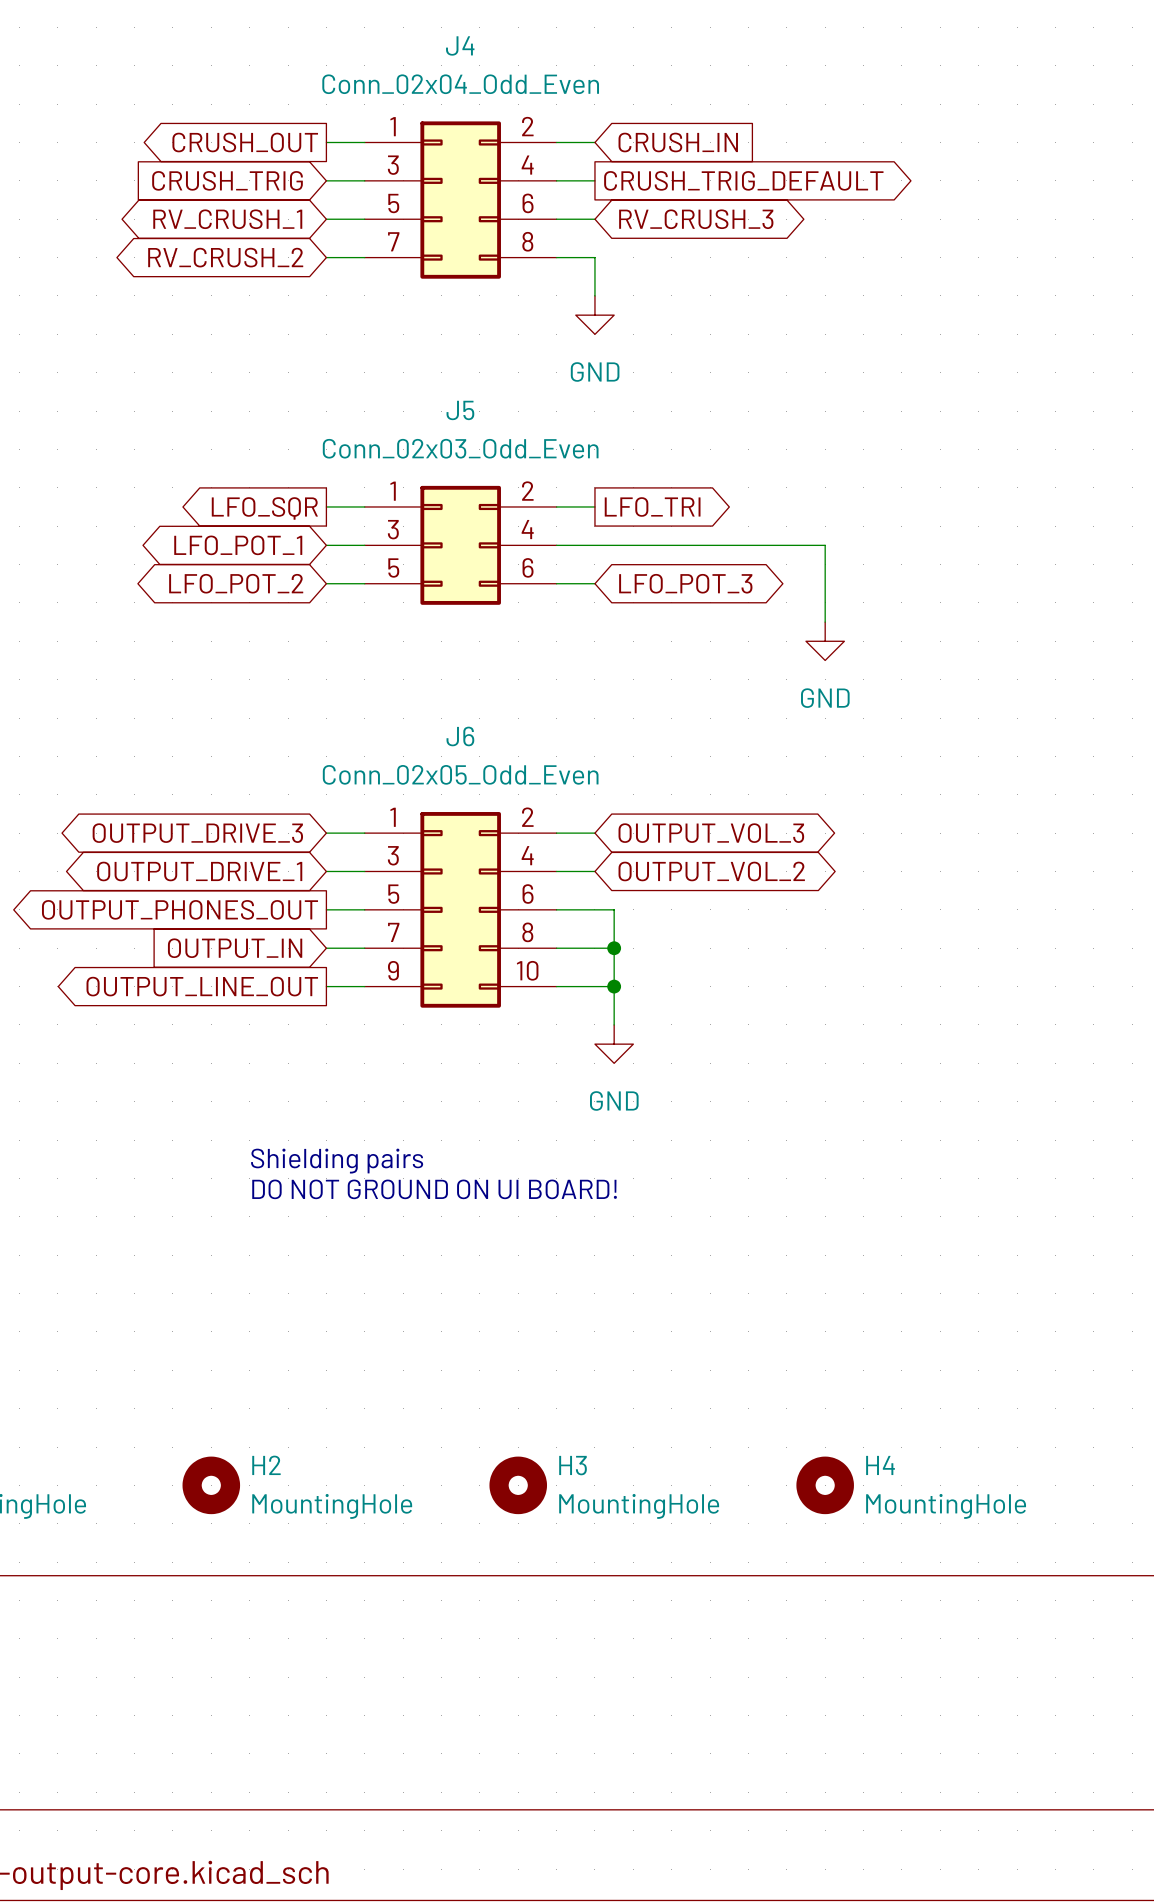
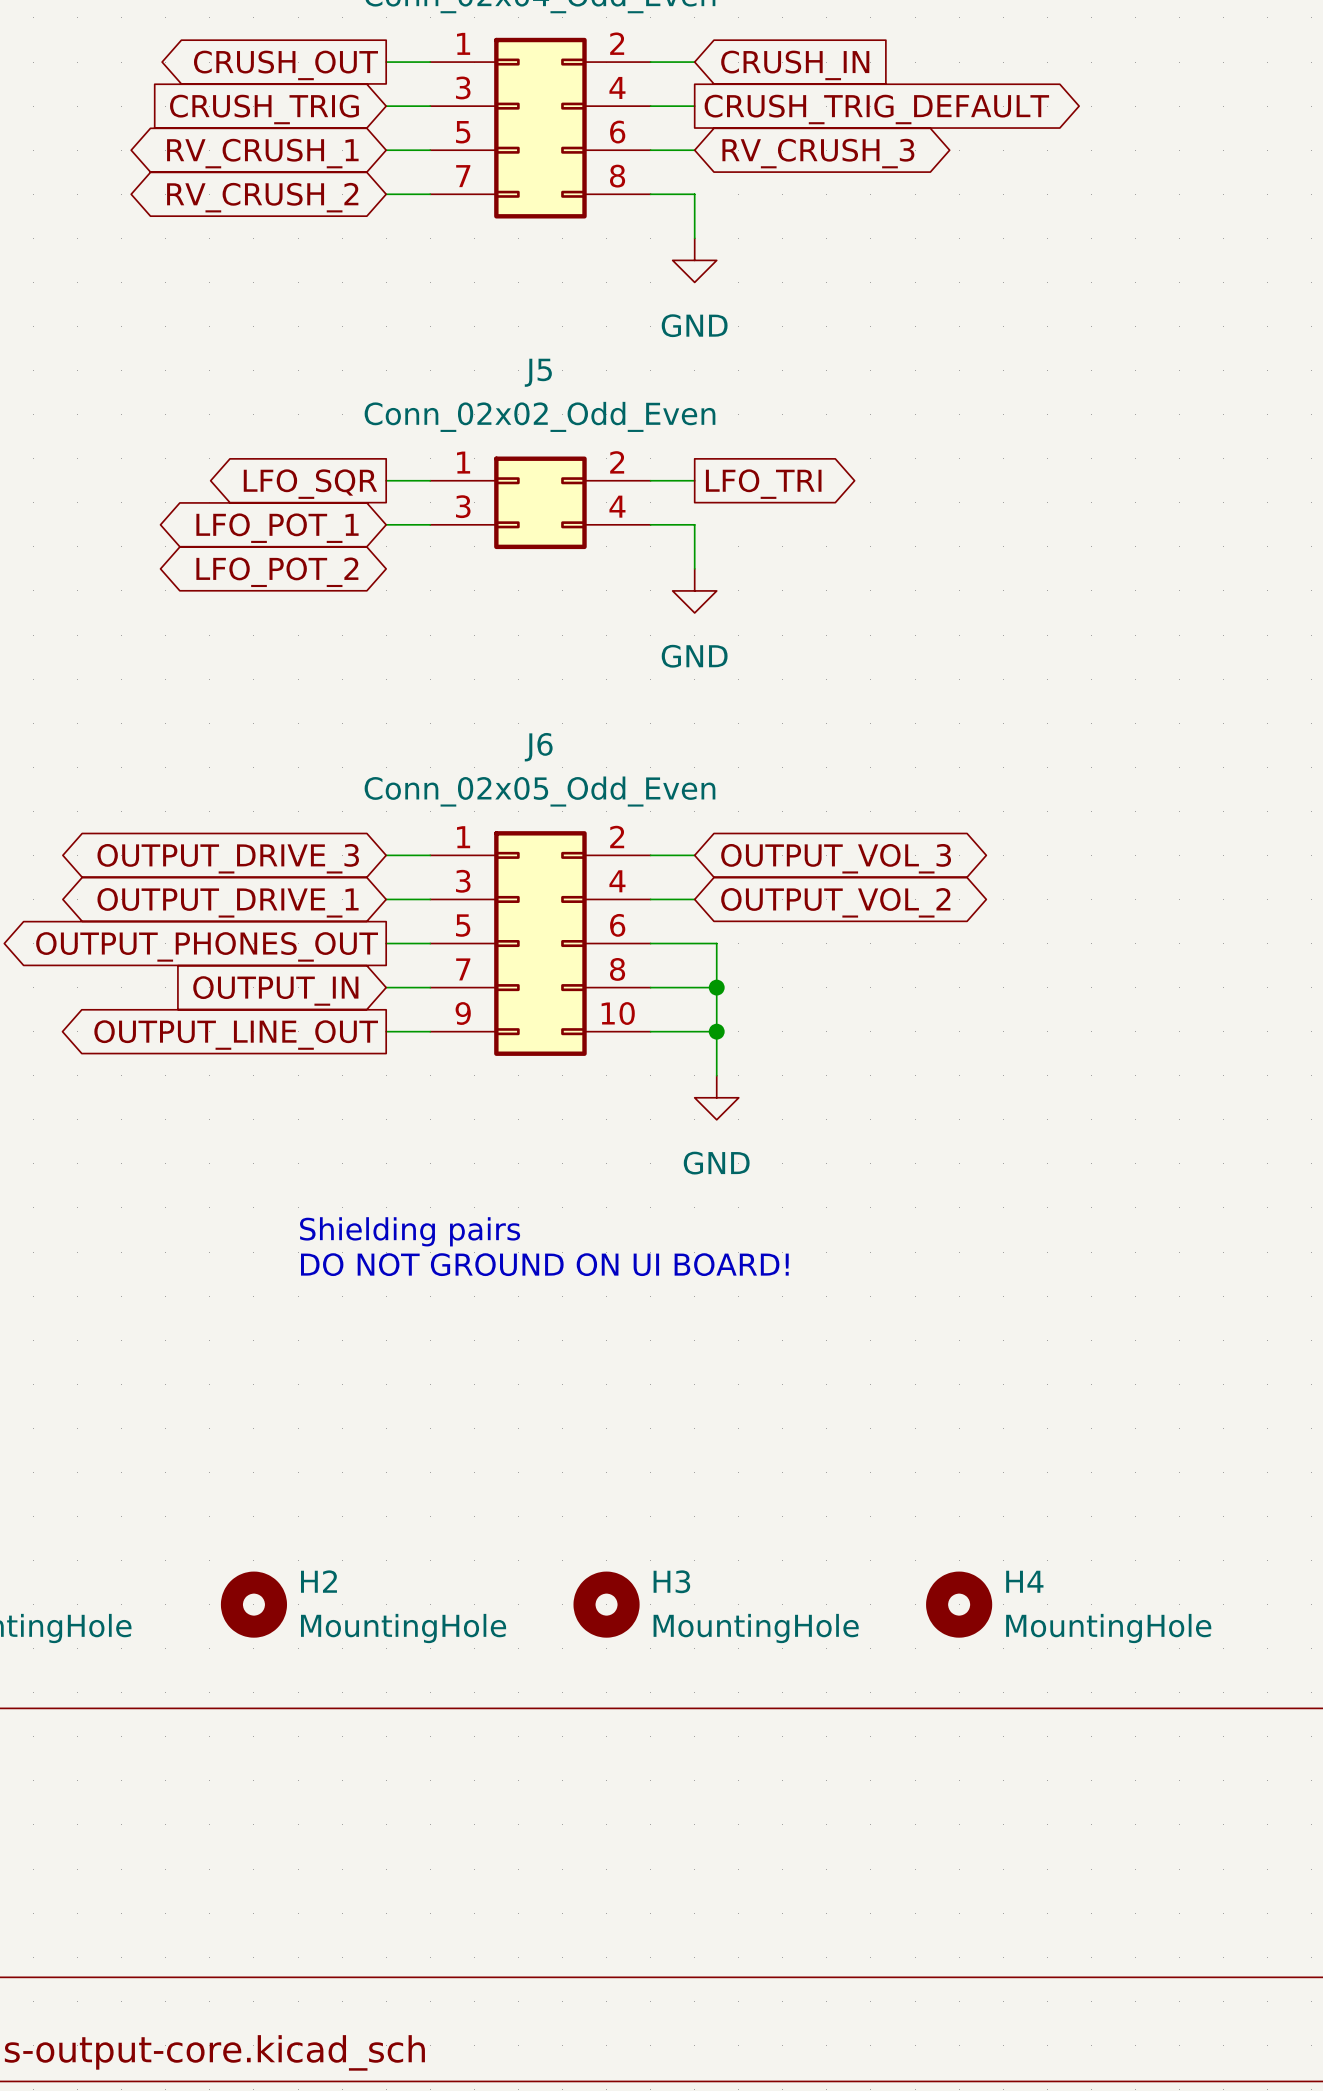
J5 value: Conn_02x03_Odd_Even (460, 448) -> Conn_02x02_Odd_Even (540, 416)
J5 symbol: [364, 485, 557, 605] -> [430, 456, 651, 550]
wire: (594, 545) (825, 545) (825, 622) -> none
wire: (326, 583) (364, 583) -> none
wire: (556, 583) (594, 583) -> (694, 524) (694, 568)
global label: LFO_POT_3 (685, 583) -> none
power symbol position: GND (825, 641) -> GND (694, 590)

